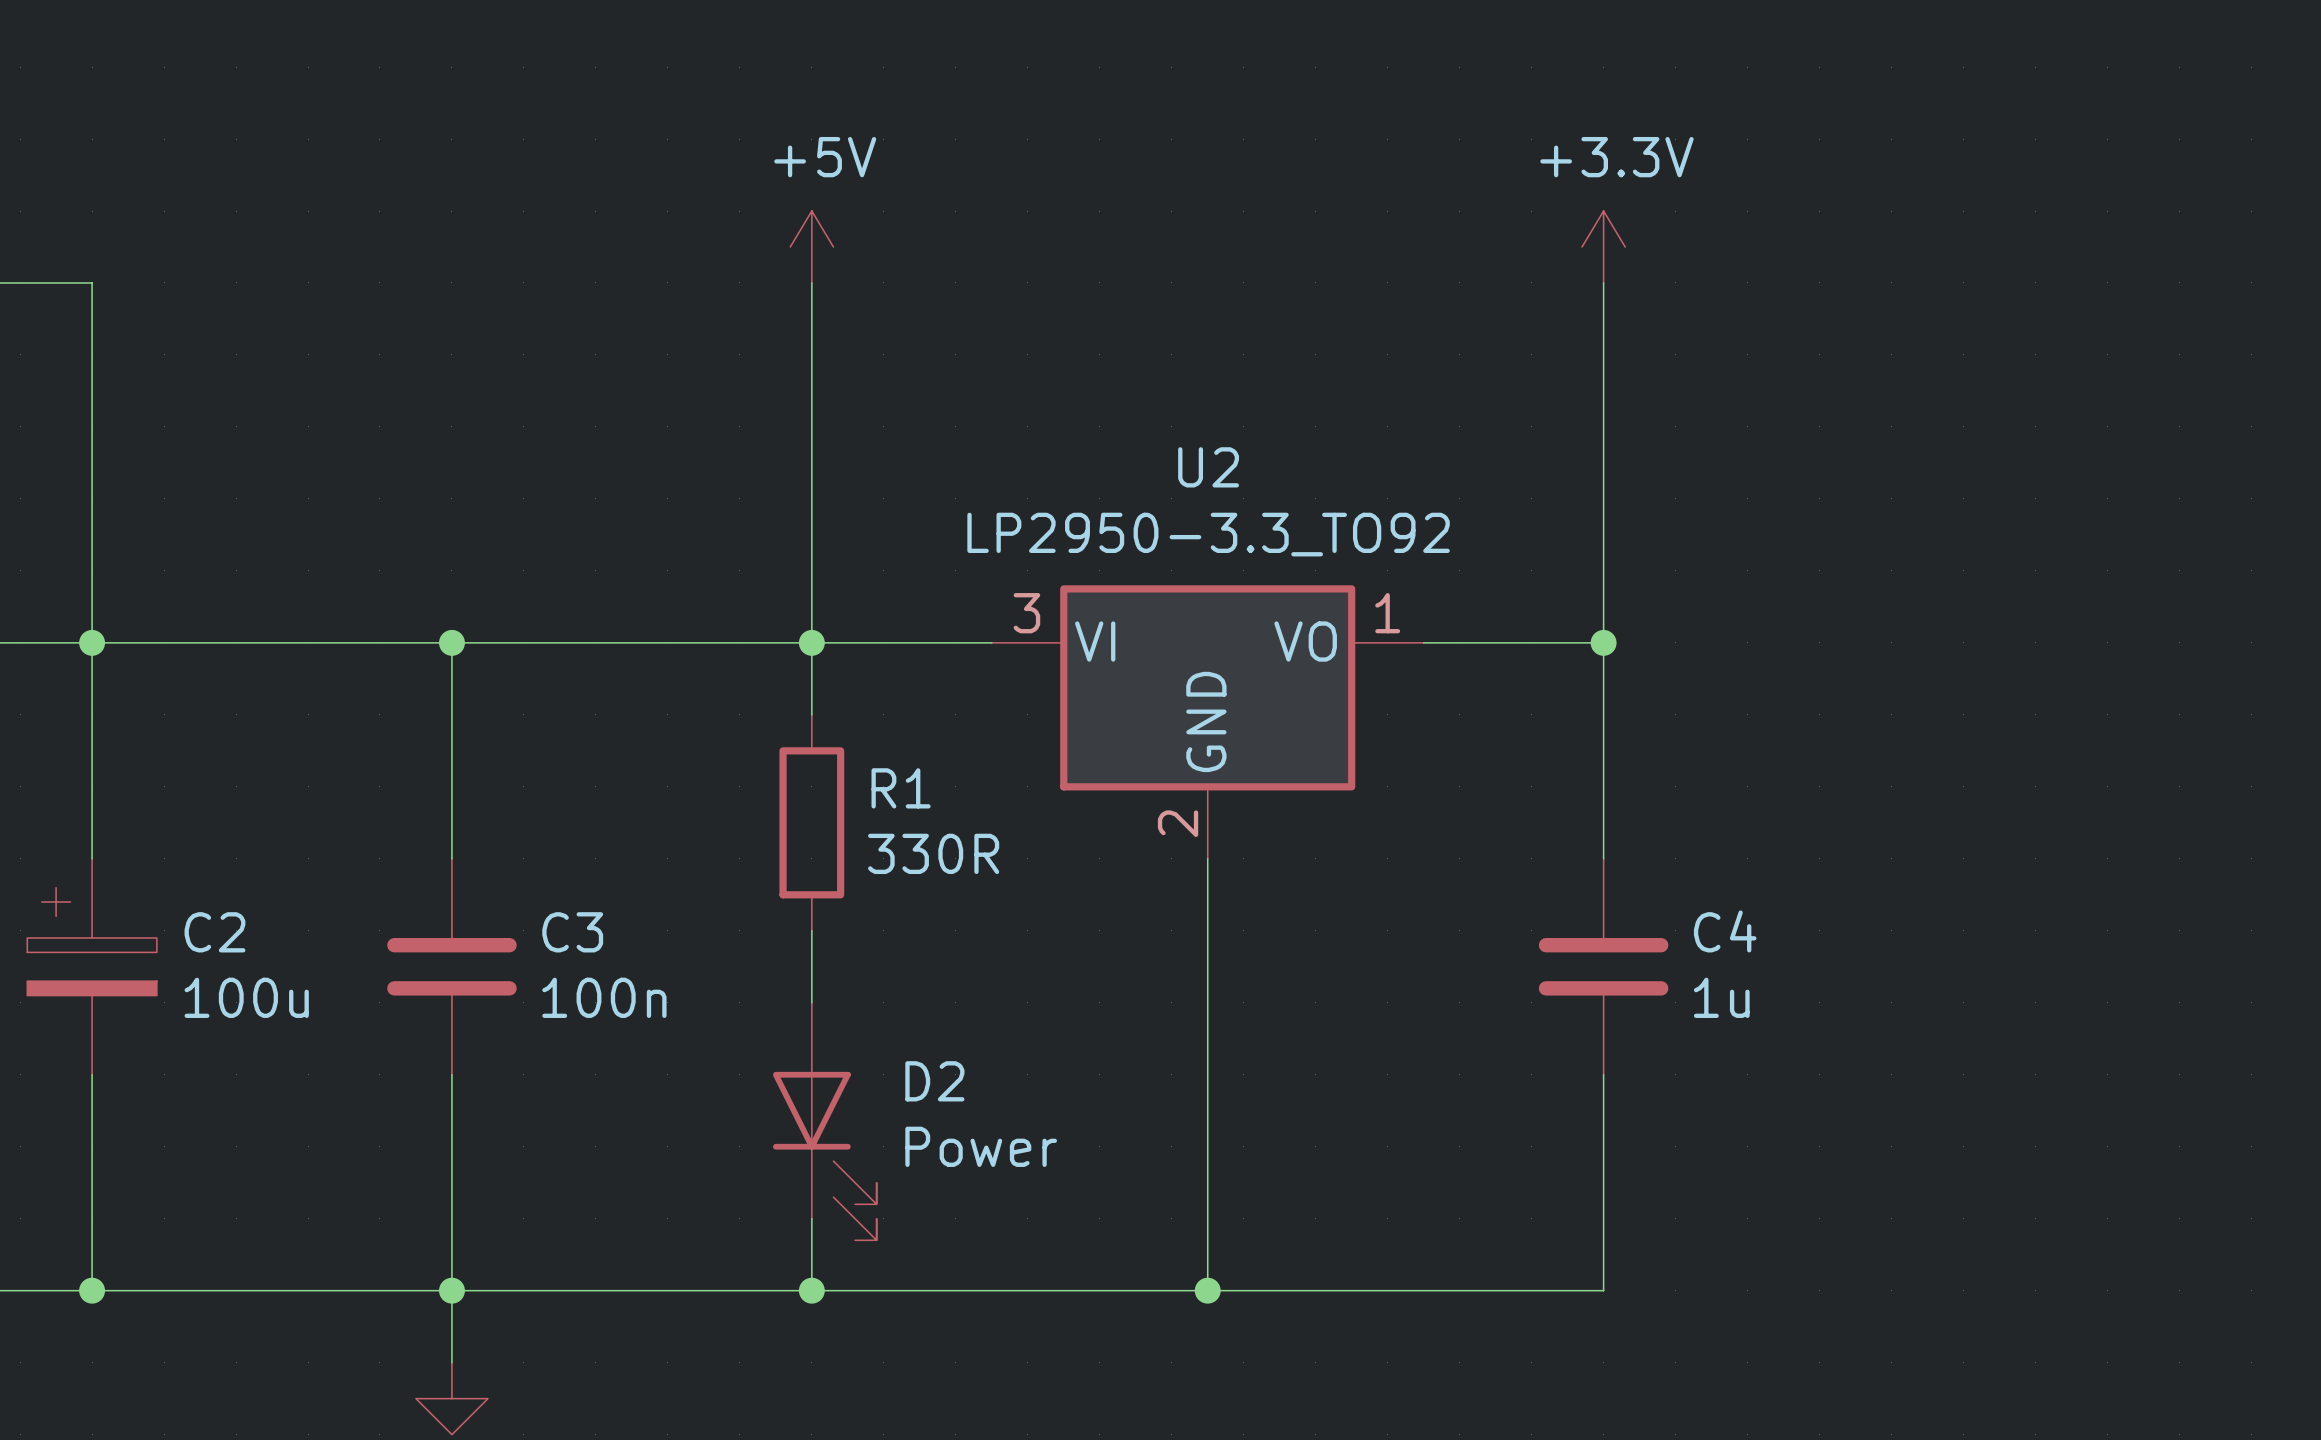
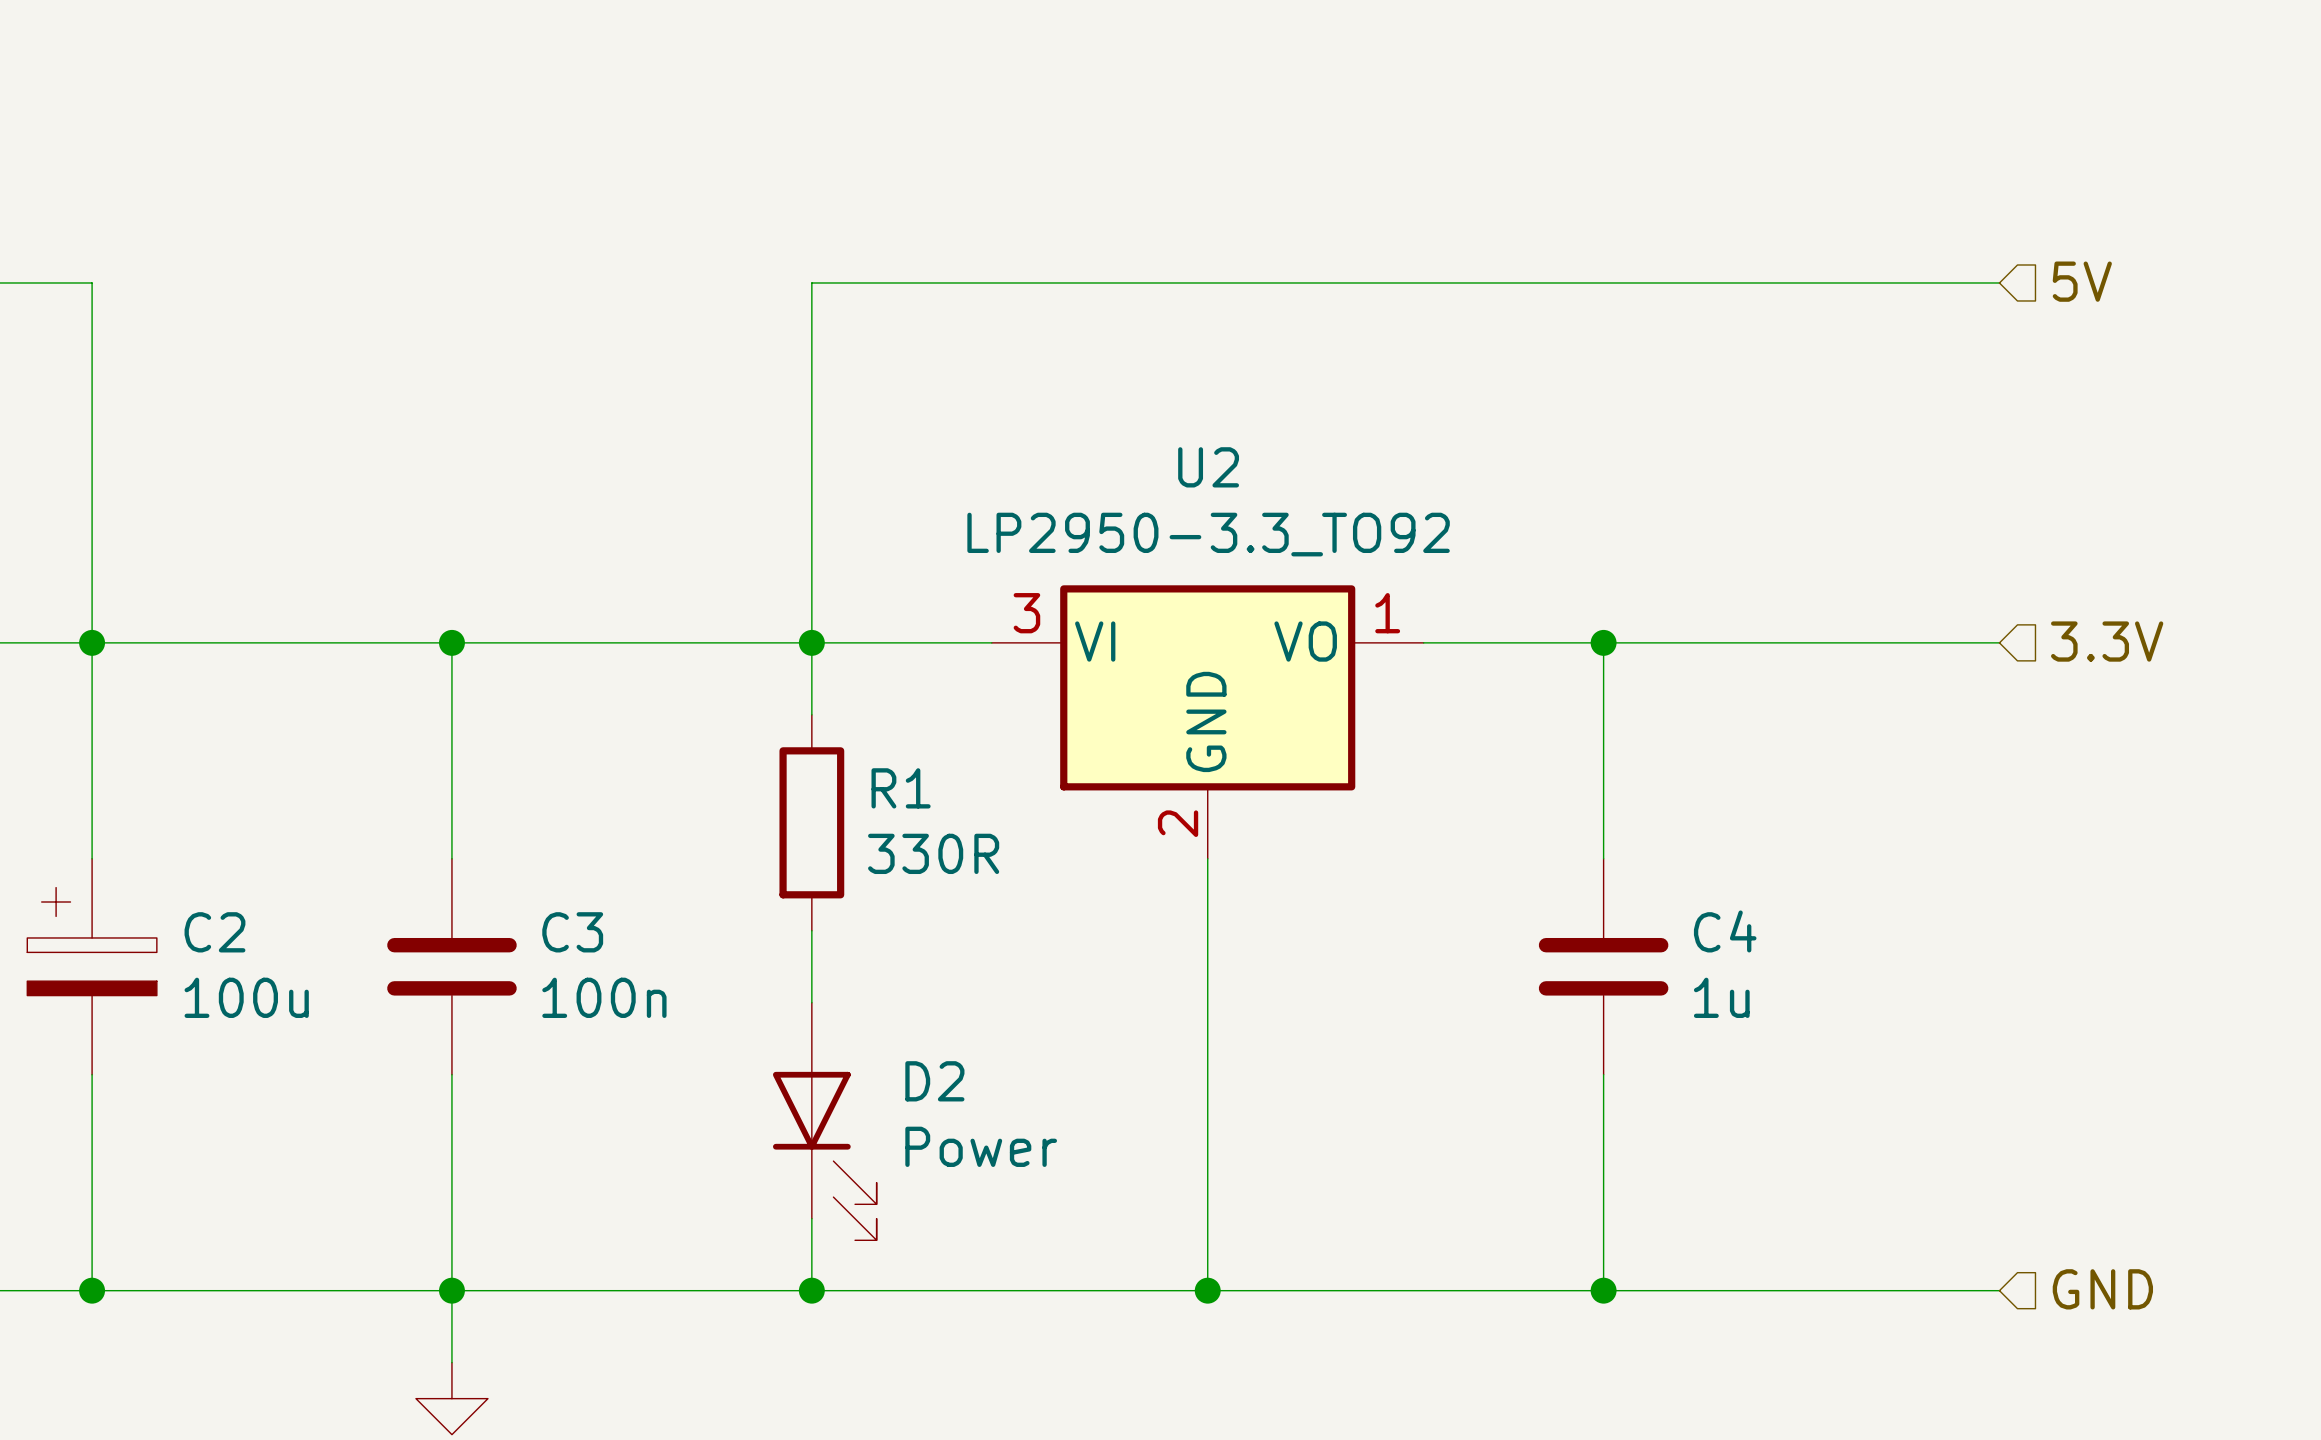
power symbol: +5V (811, 247) -> none
power symbol: +3.3V (1603, 247) -> none
hierarchical label: none -> 5V (2082, 281)
wire: none -> (811, 282) (1999, 282)
wire: (1603, 282) (1603, 642) -> (1999, 642) (1603, 642)
hierarchical label: none -> 3.3V (2107, 641)
hierarchical label: none -> GND (2102, 1289)
wire: none -> (1603, 1290) (1999, 1290)
junction: none -> (1603, 1290)

